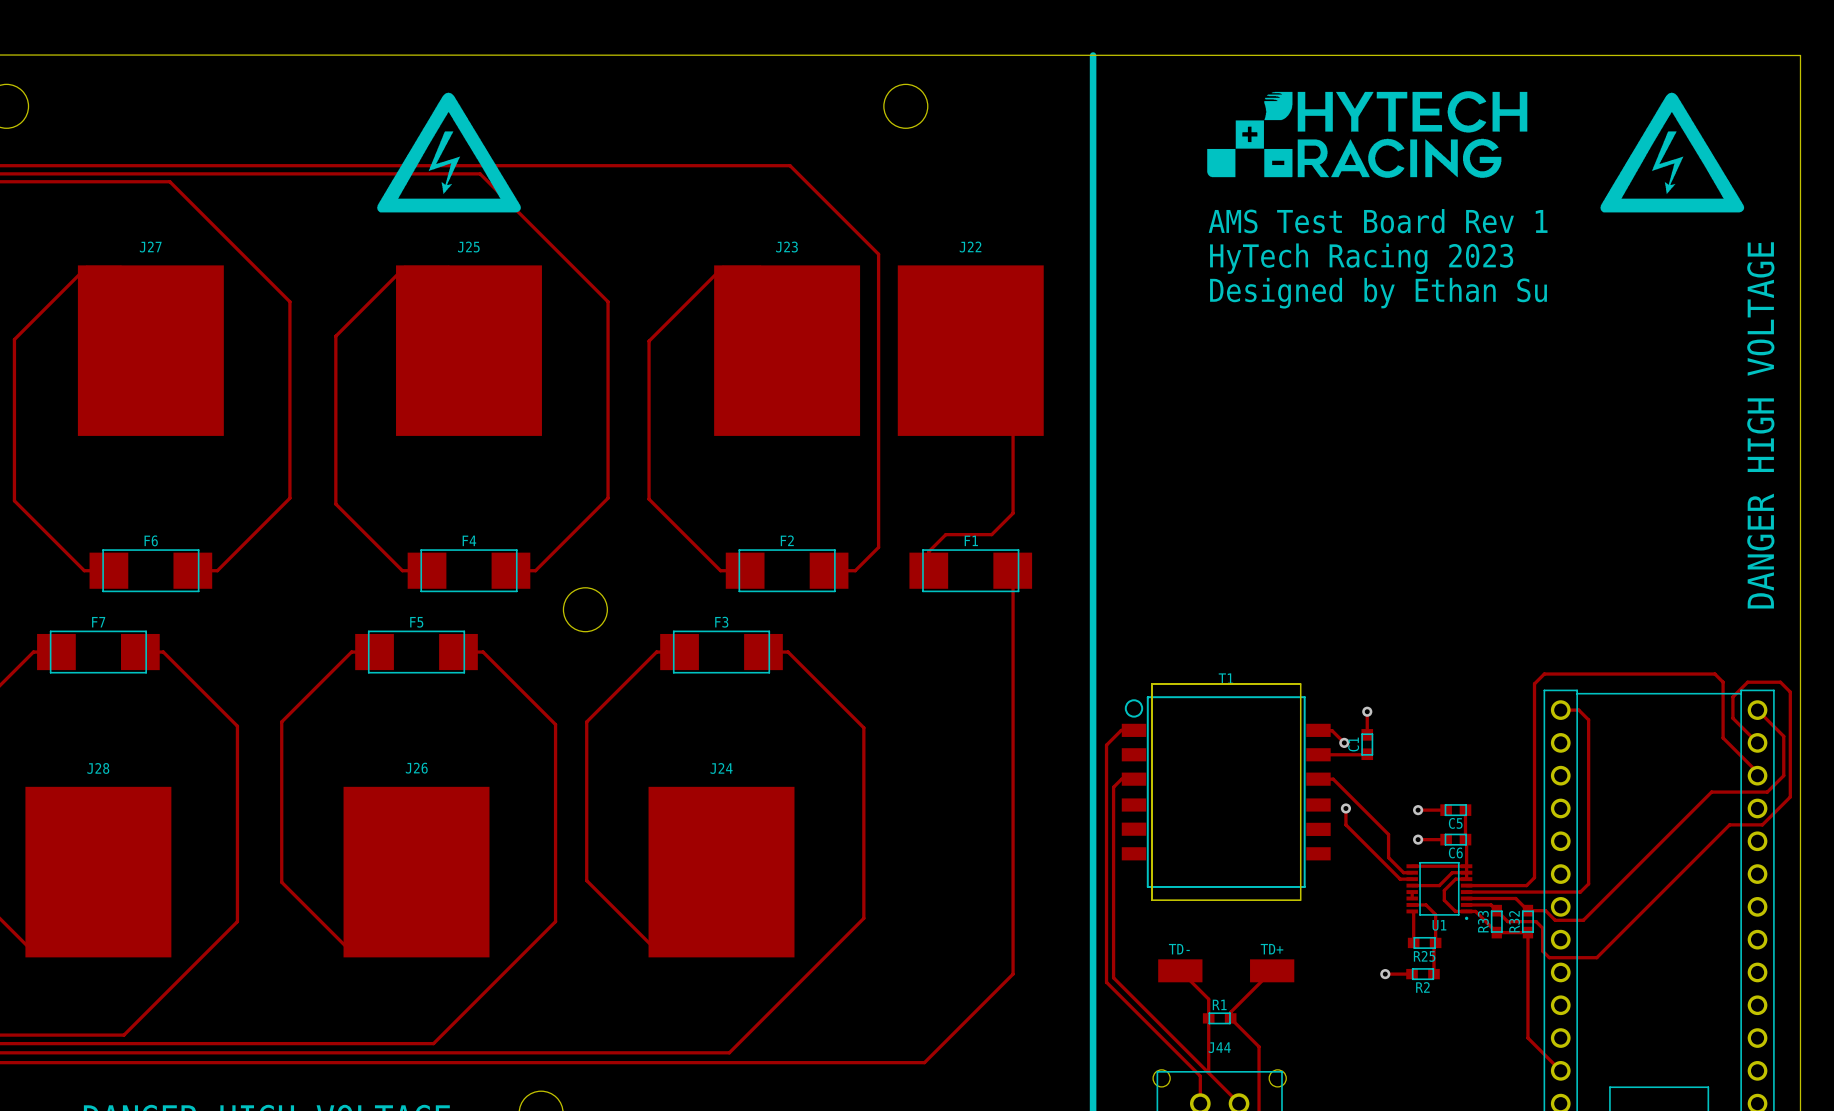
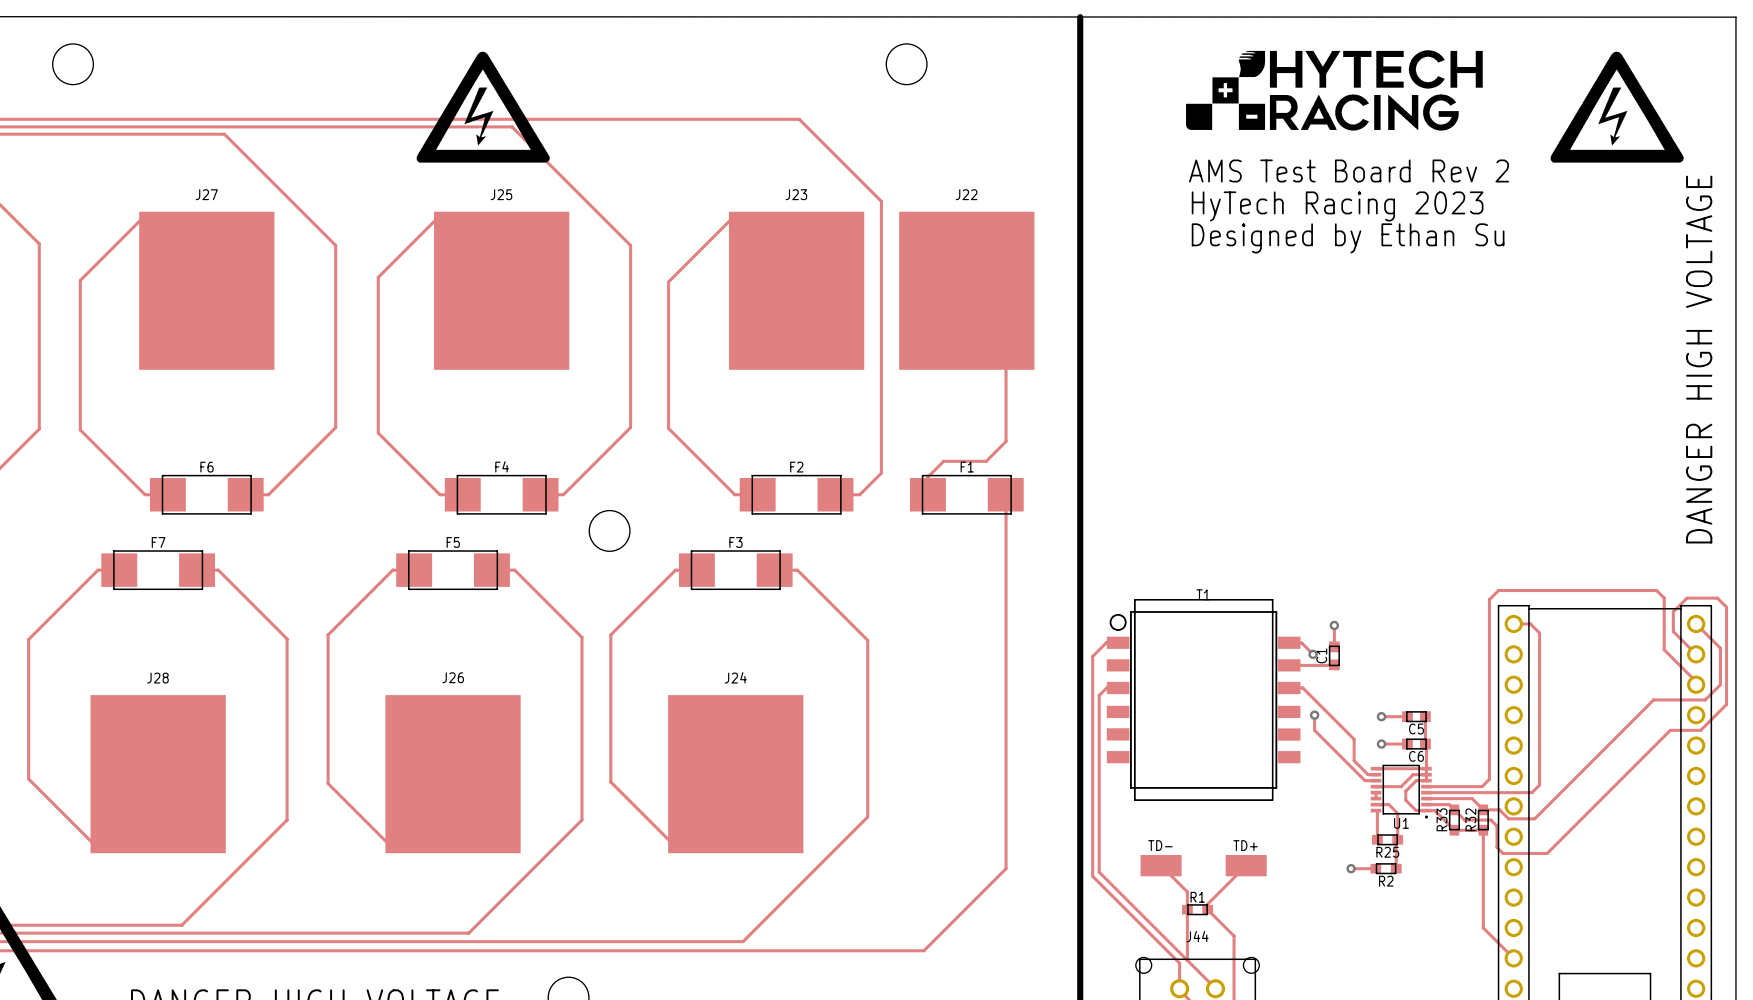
text: AMS Test Board Rev 1 (1378, 221) -> AMS Test Board Rev 2 (1349, 170)

